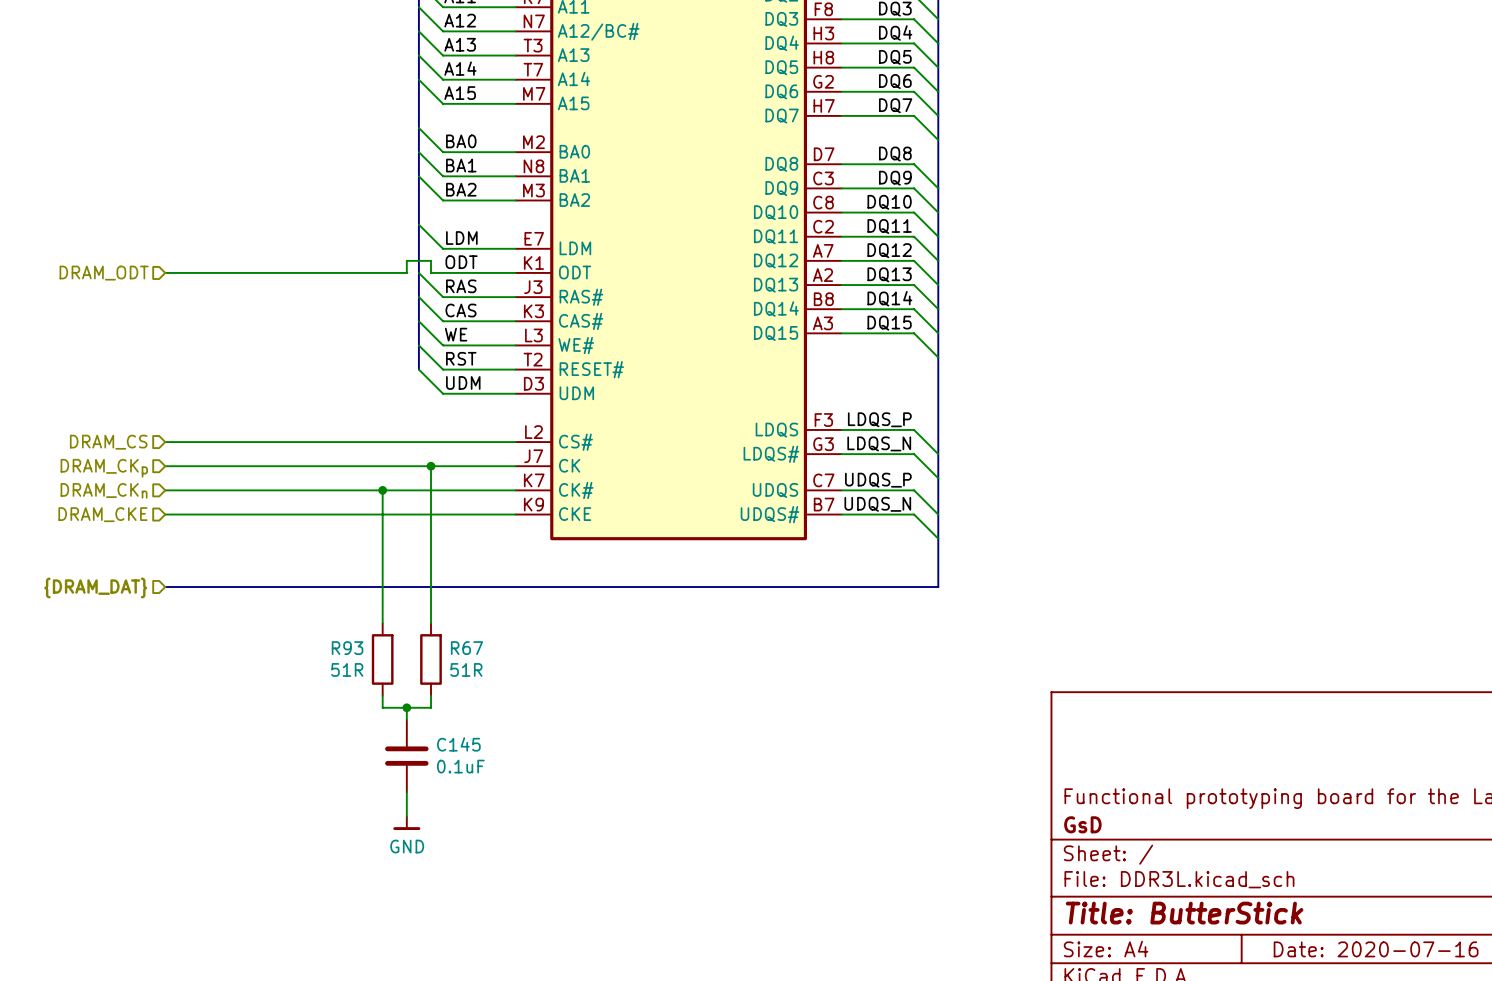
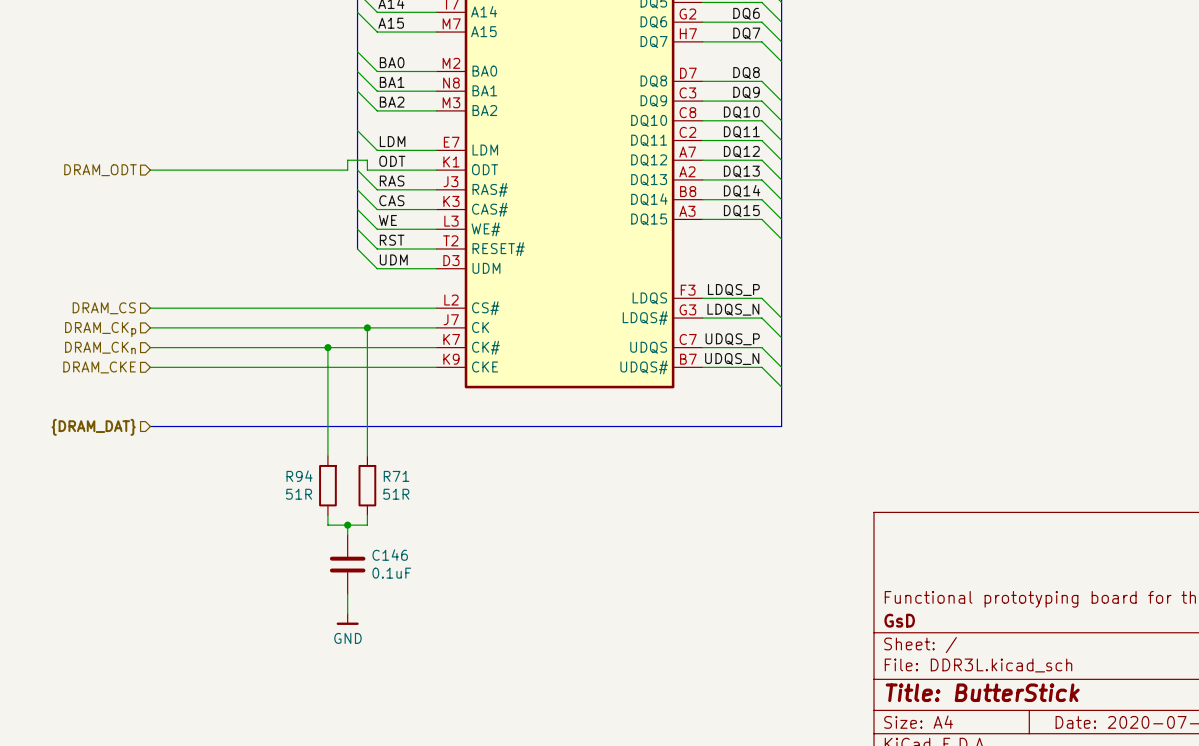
R93 name: R93 (347, 648) -> R94 (299, 476)
R67 name: R67 (466, 648) -> R71 (396, 476)
C145 name: C145 (458, 744) -> C146 (390, 555)

